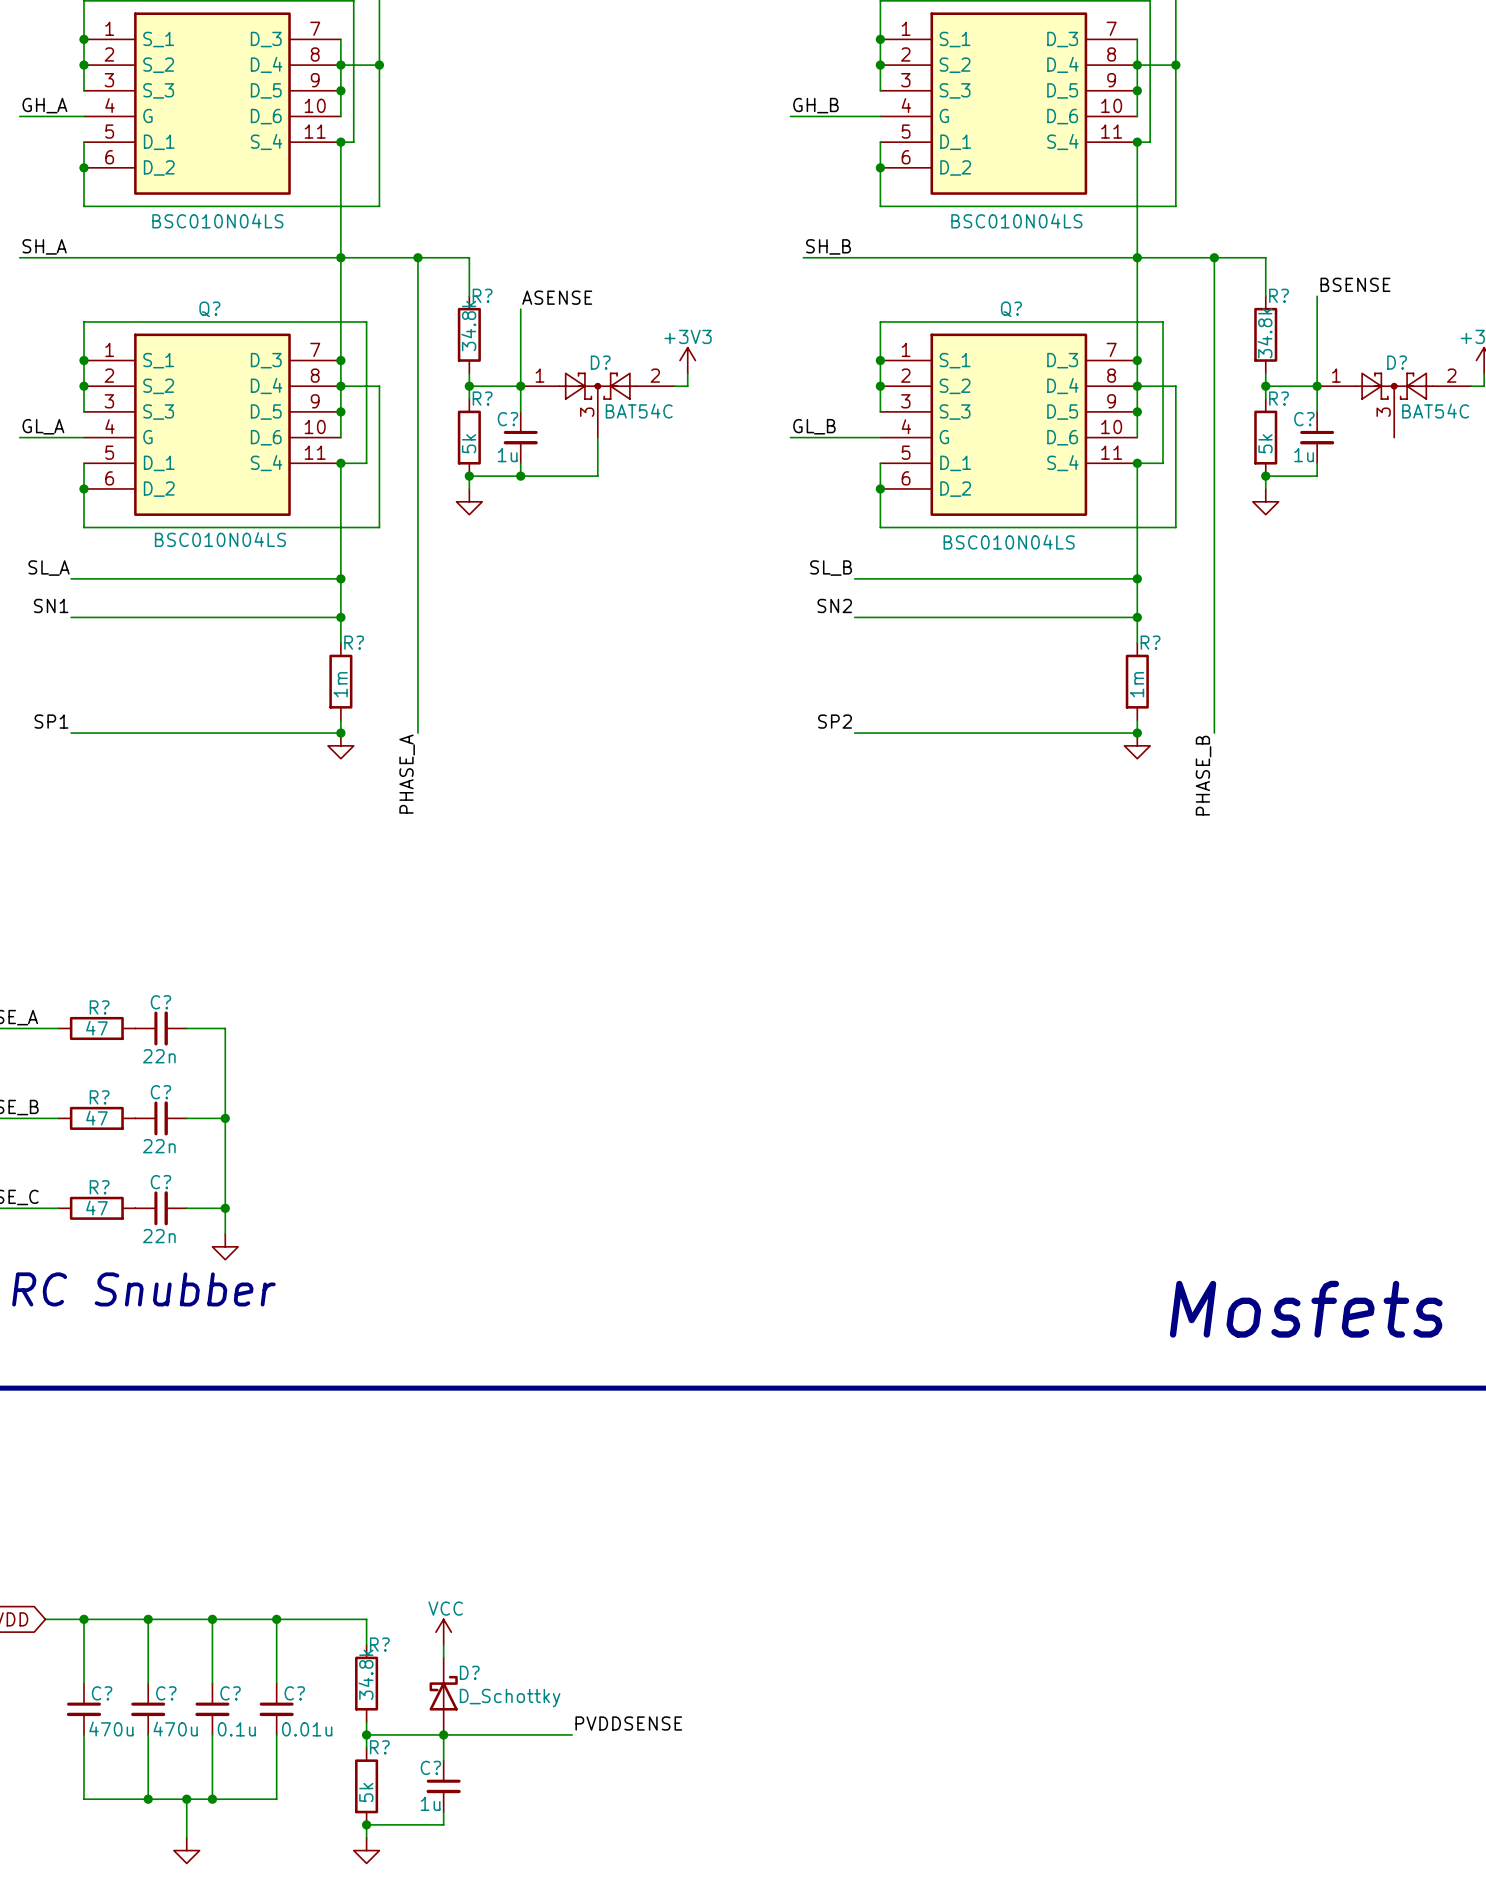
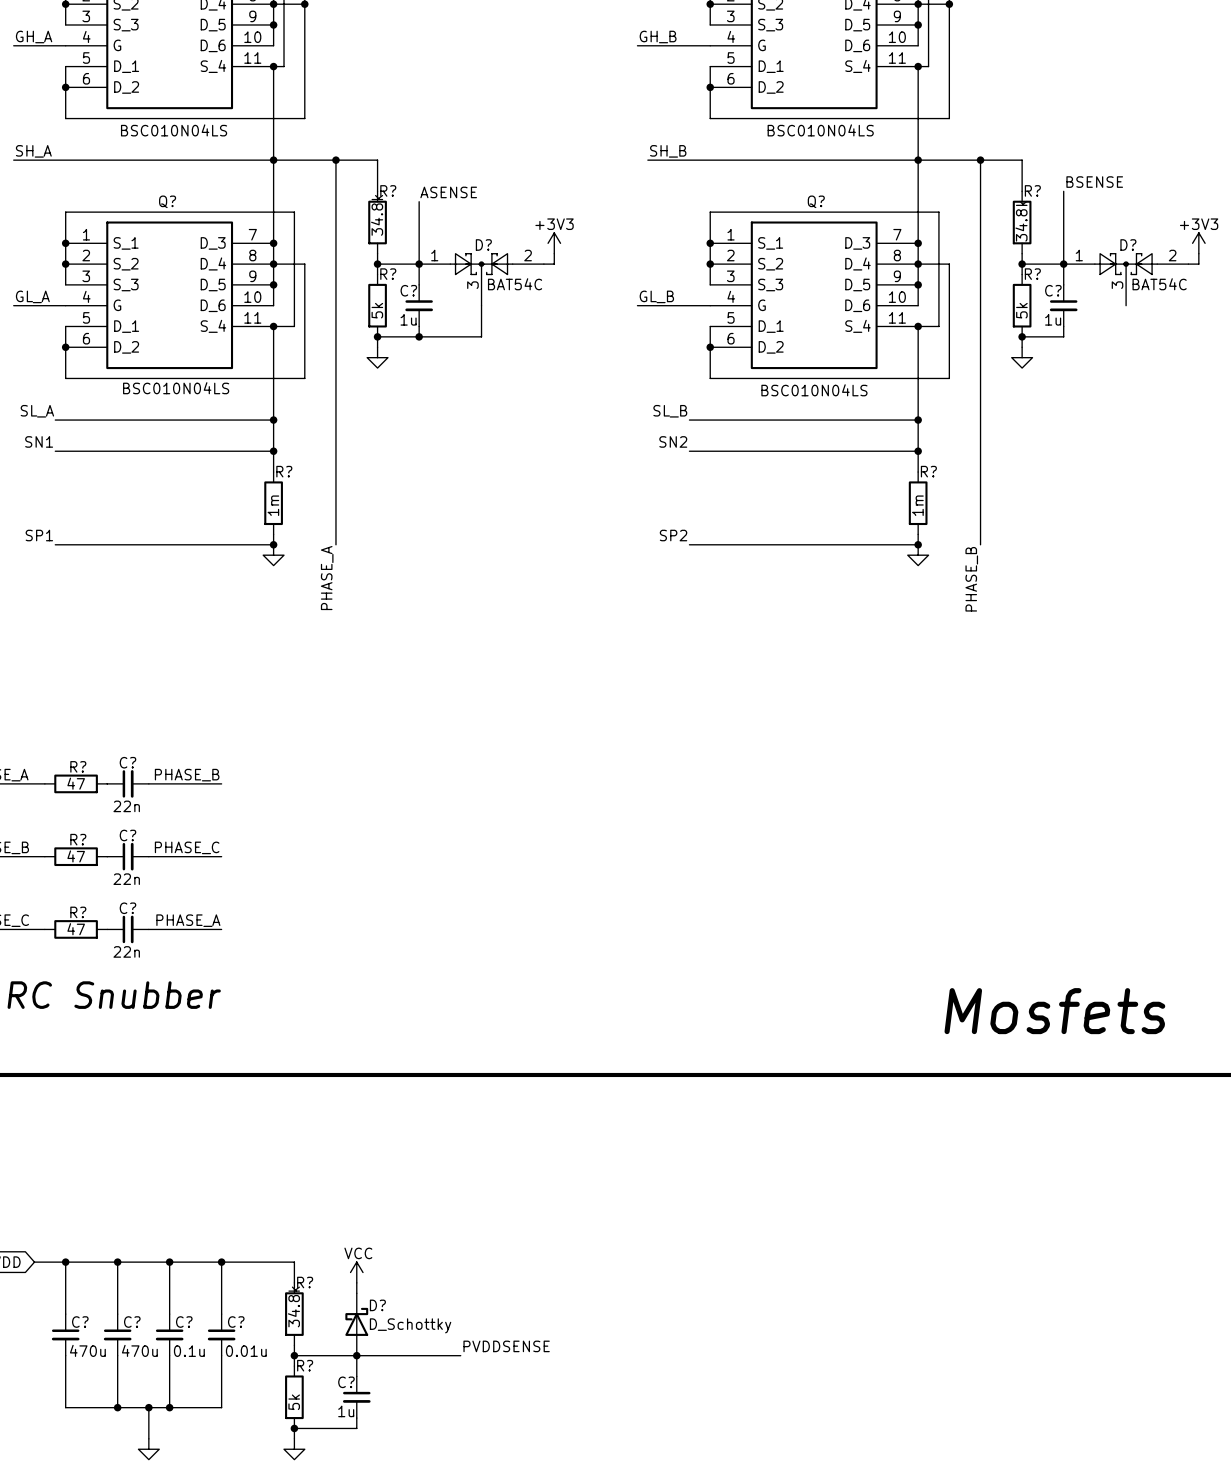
label: none -> PHASE_B (187, 775)
wire: (225, 1028) (225, 1234) -> (180, 783) (221, 783)
label: none -> PHASE_C (187, 847)
wire: none -> (180, 856) (221, 856)
junction: (225, 1118) -> none
label: none -> PHASE_A (188, 920)
wire: none -> (180, 929) (221, 929)
junction: (225, 1208) -> none
power symbol: (225, 1246) -> none

